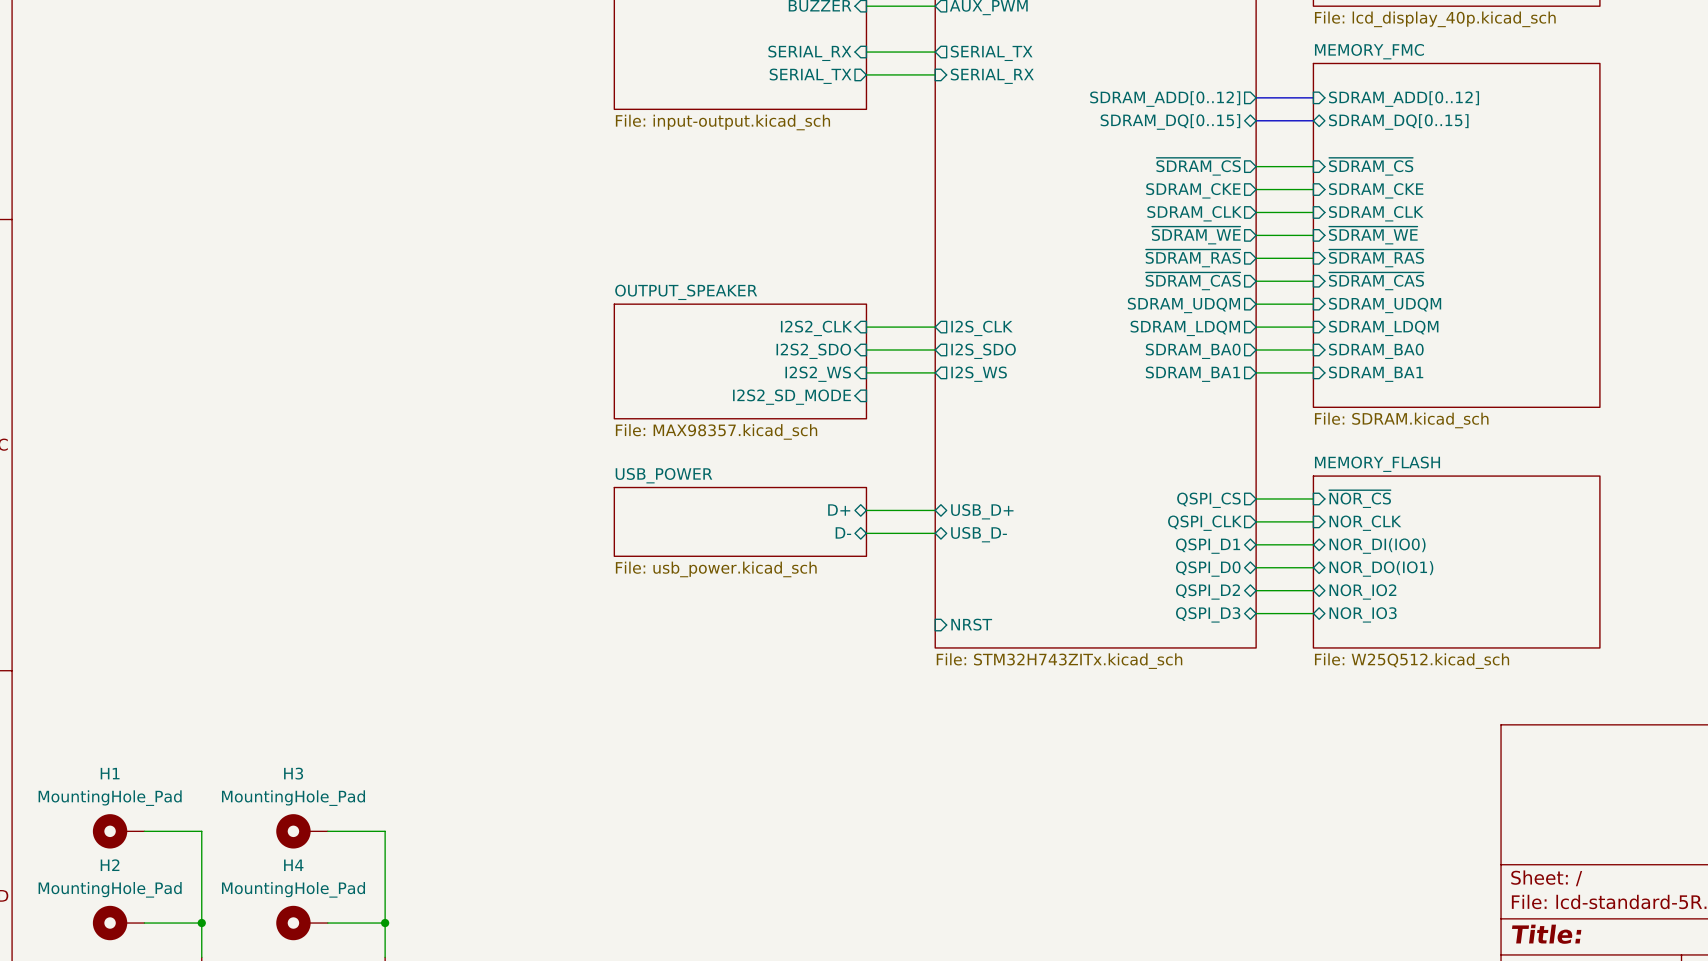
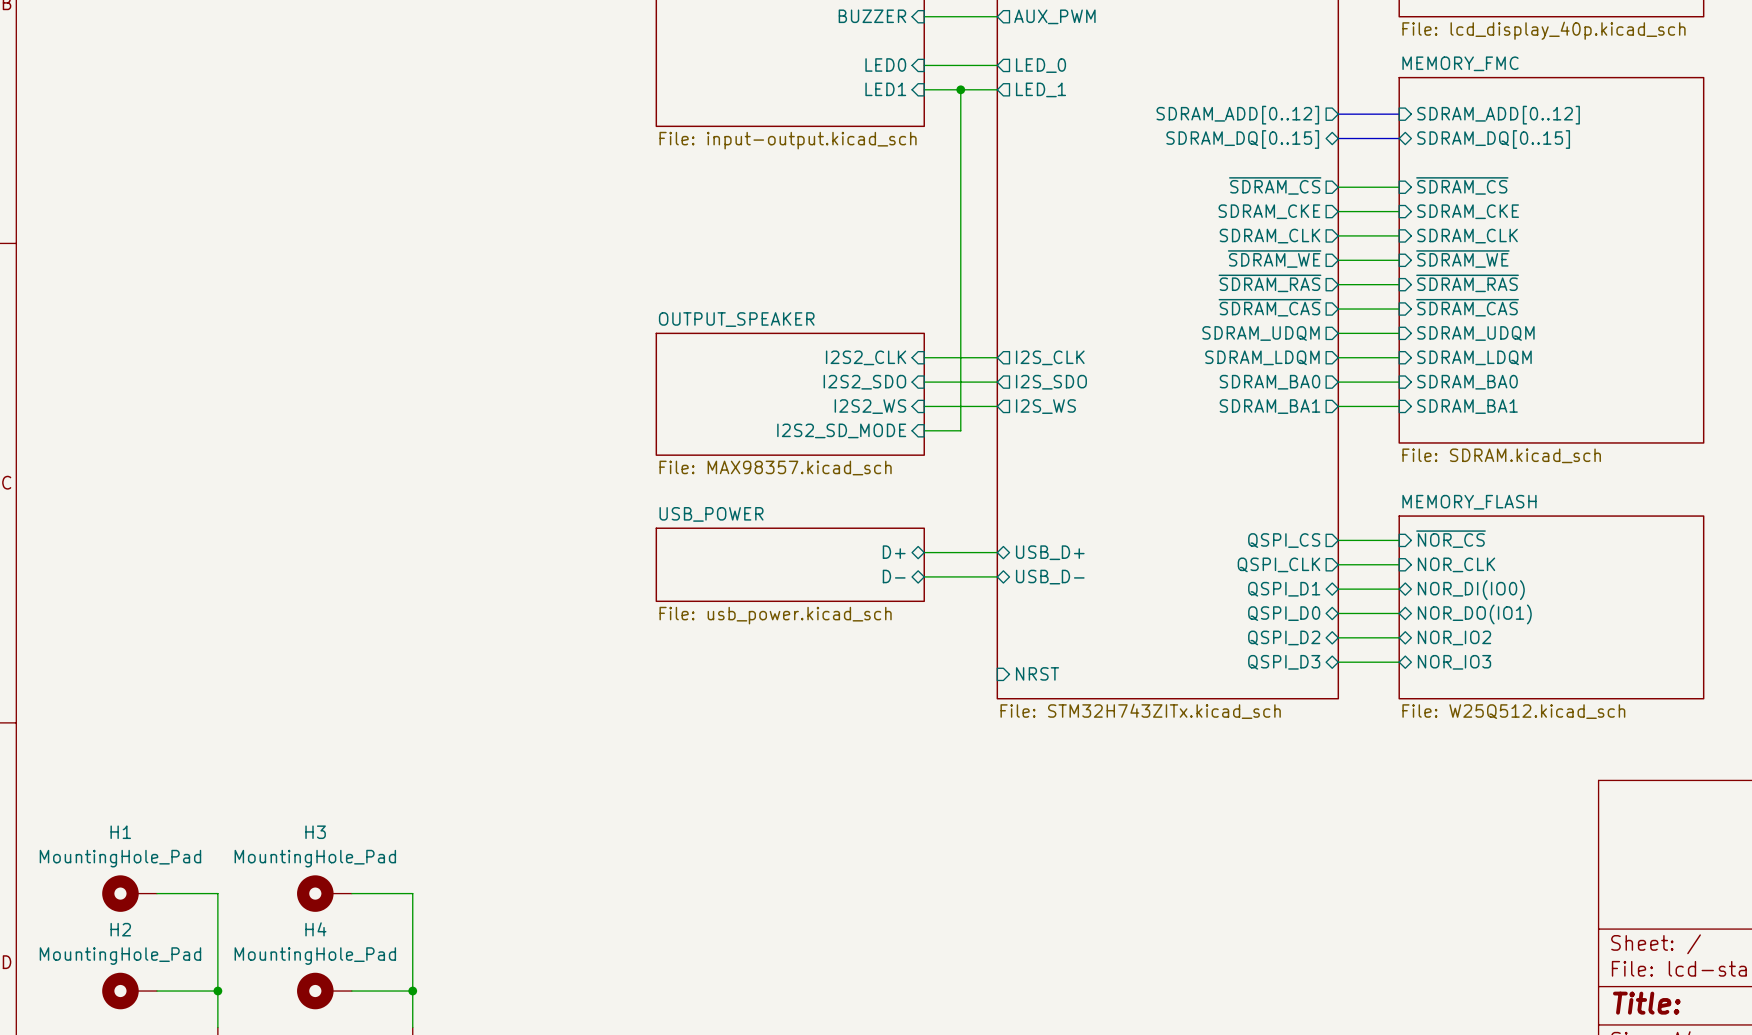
sheet pin: SERIAL_RX (809, 53) -> LED0 (885, 64)
sheet pin: SERIAL_TX (991, 53) -> LED_0 (1041, 65)
wire: none -> (960, 89) (960, 430) (924, 430)
junction: none -> (960, 89)
sheet pin shape: output (810, 76) -> input (885, 89)
sheet pin: SERIAL_TX (810, 76) -> LED1 (885, 89)
sheet pin shape: input (992, 76) -> output (1041, 89)
sheet pin: SERIAL_RX (992, 76) -> LED_1 (1041, 89)

